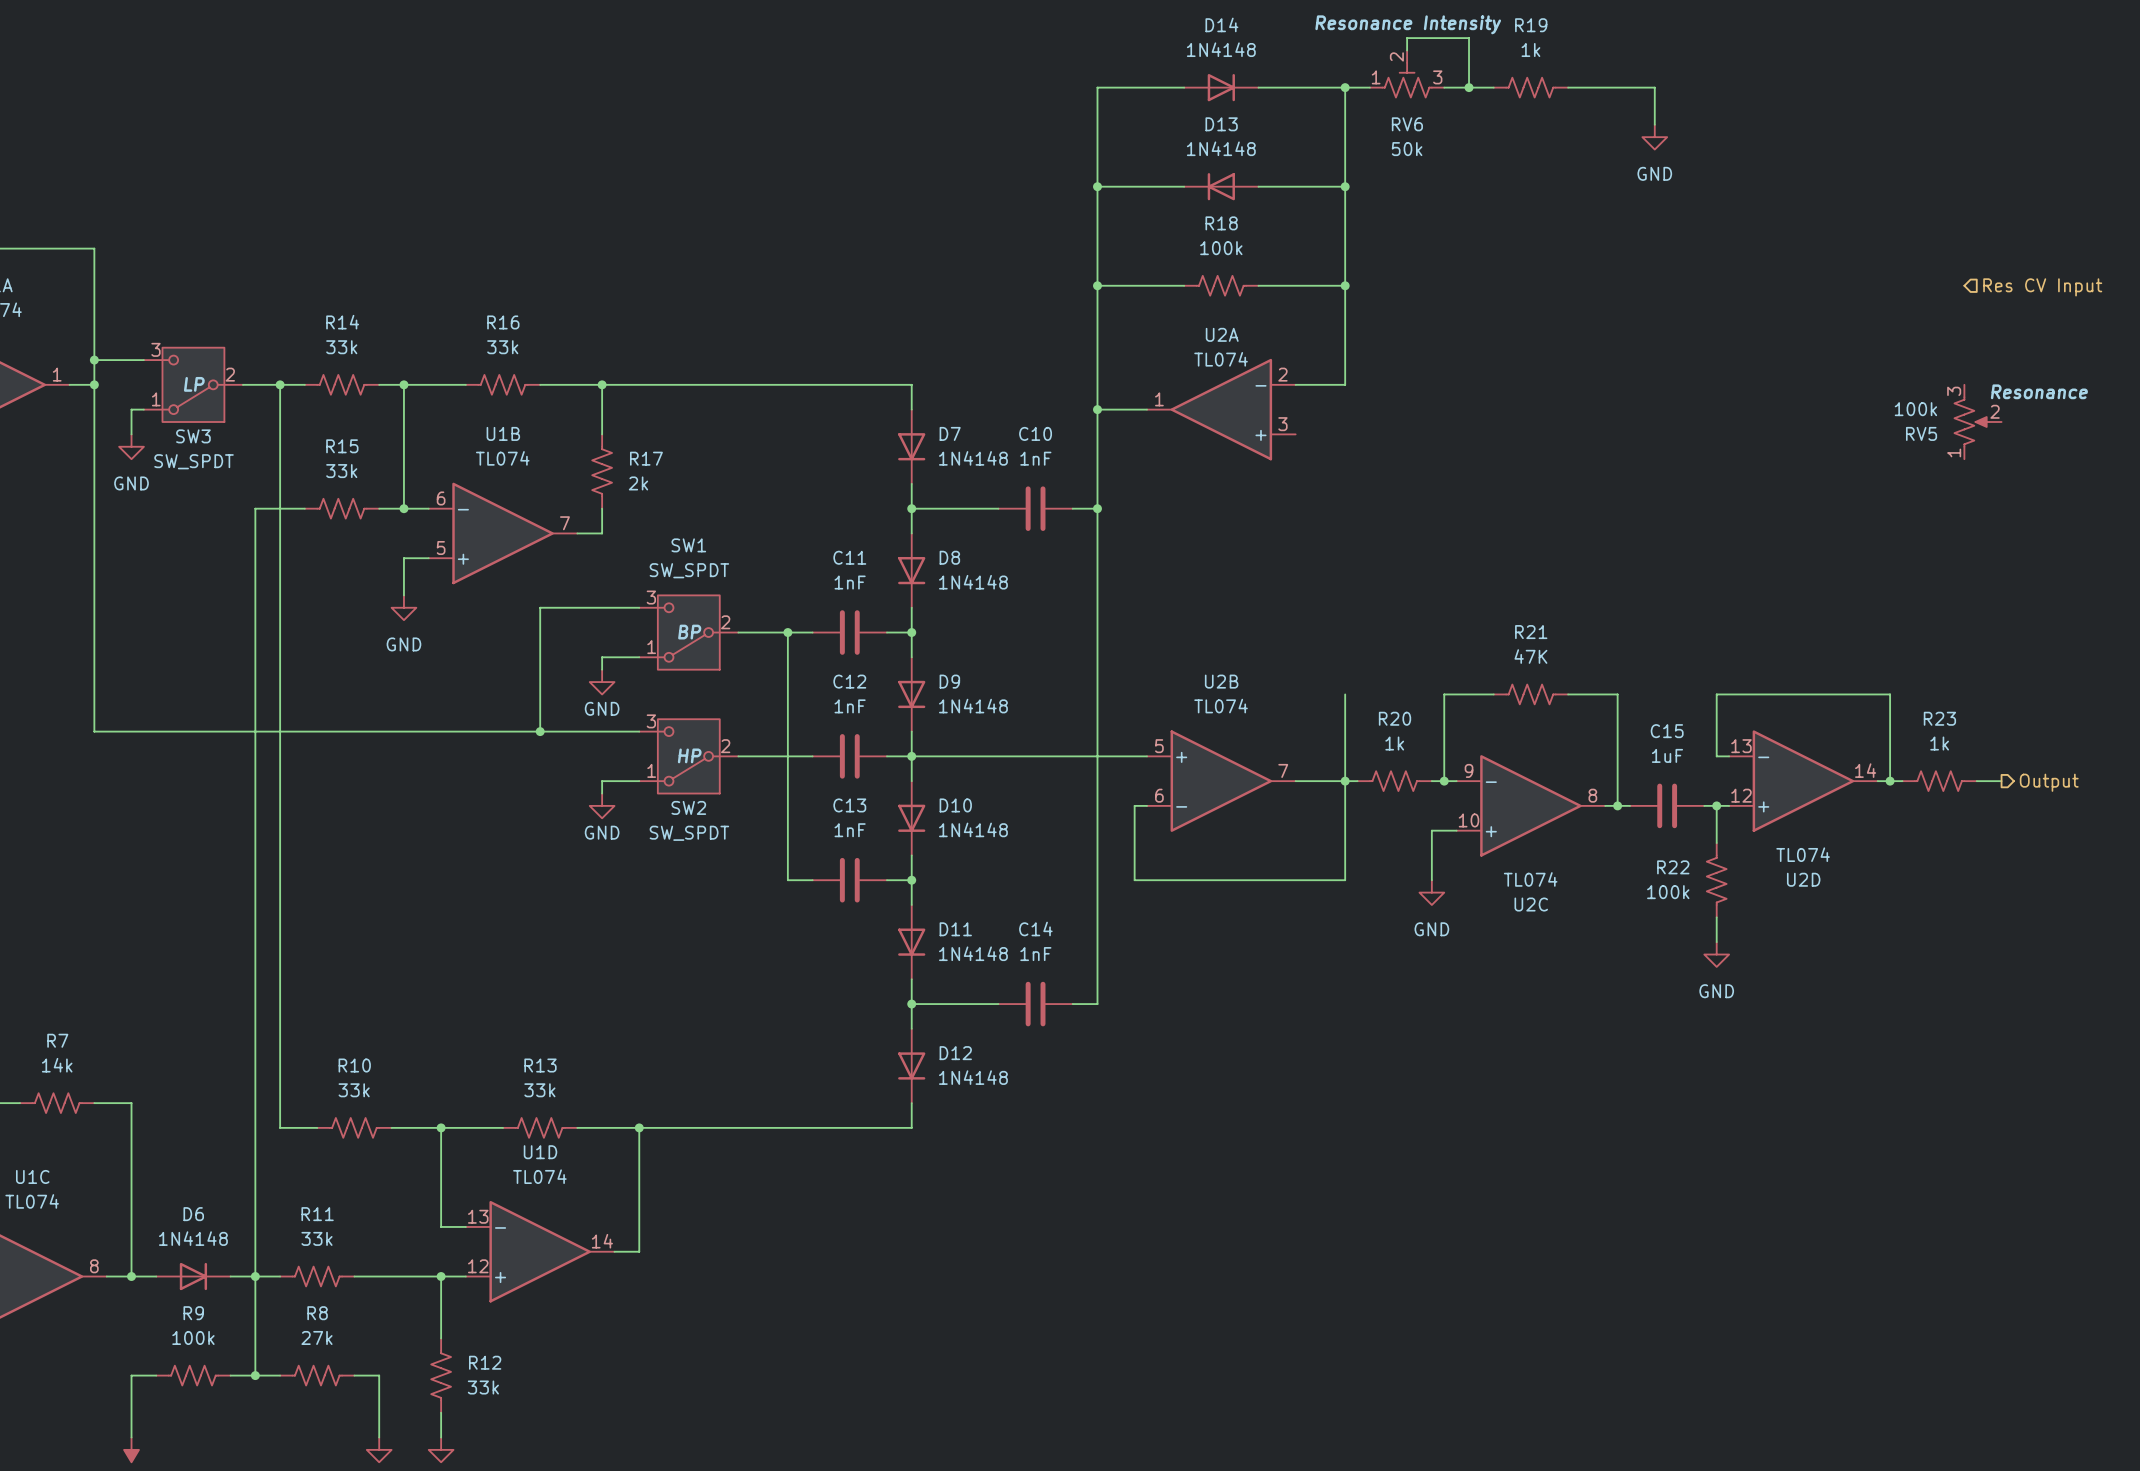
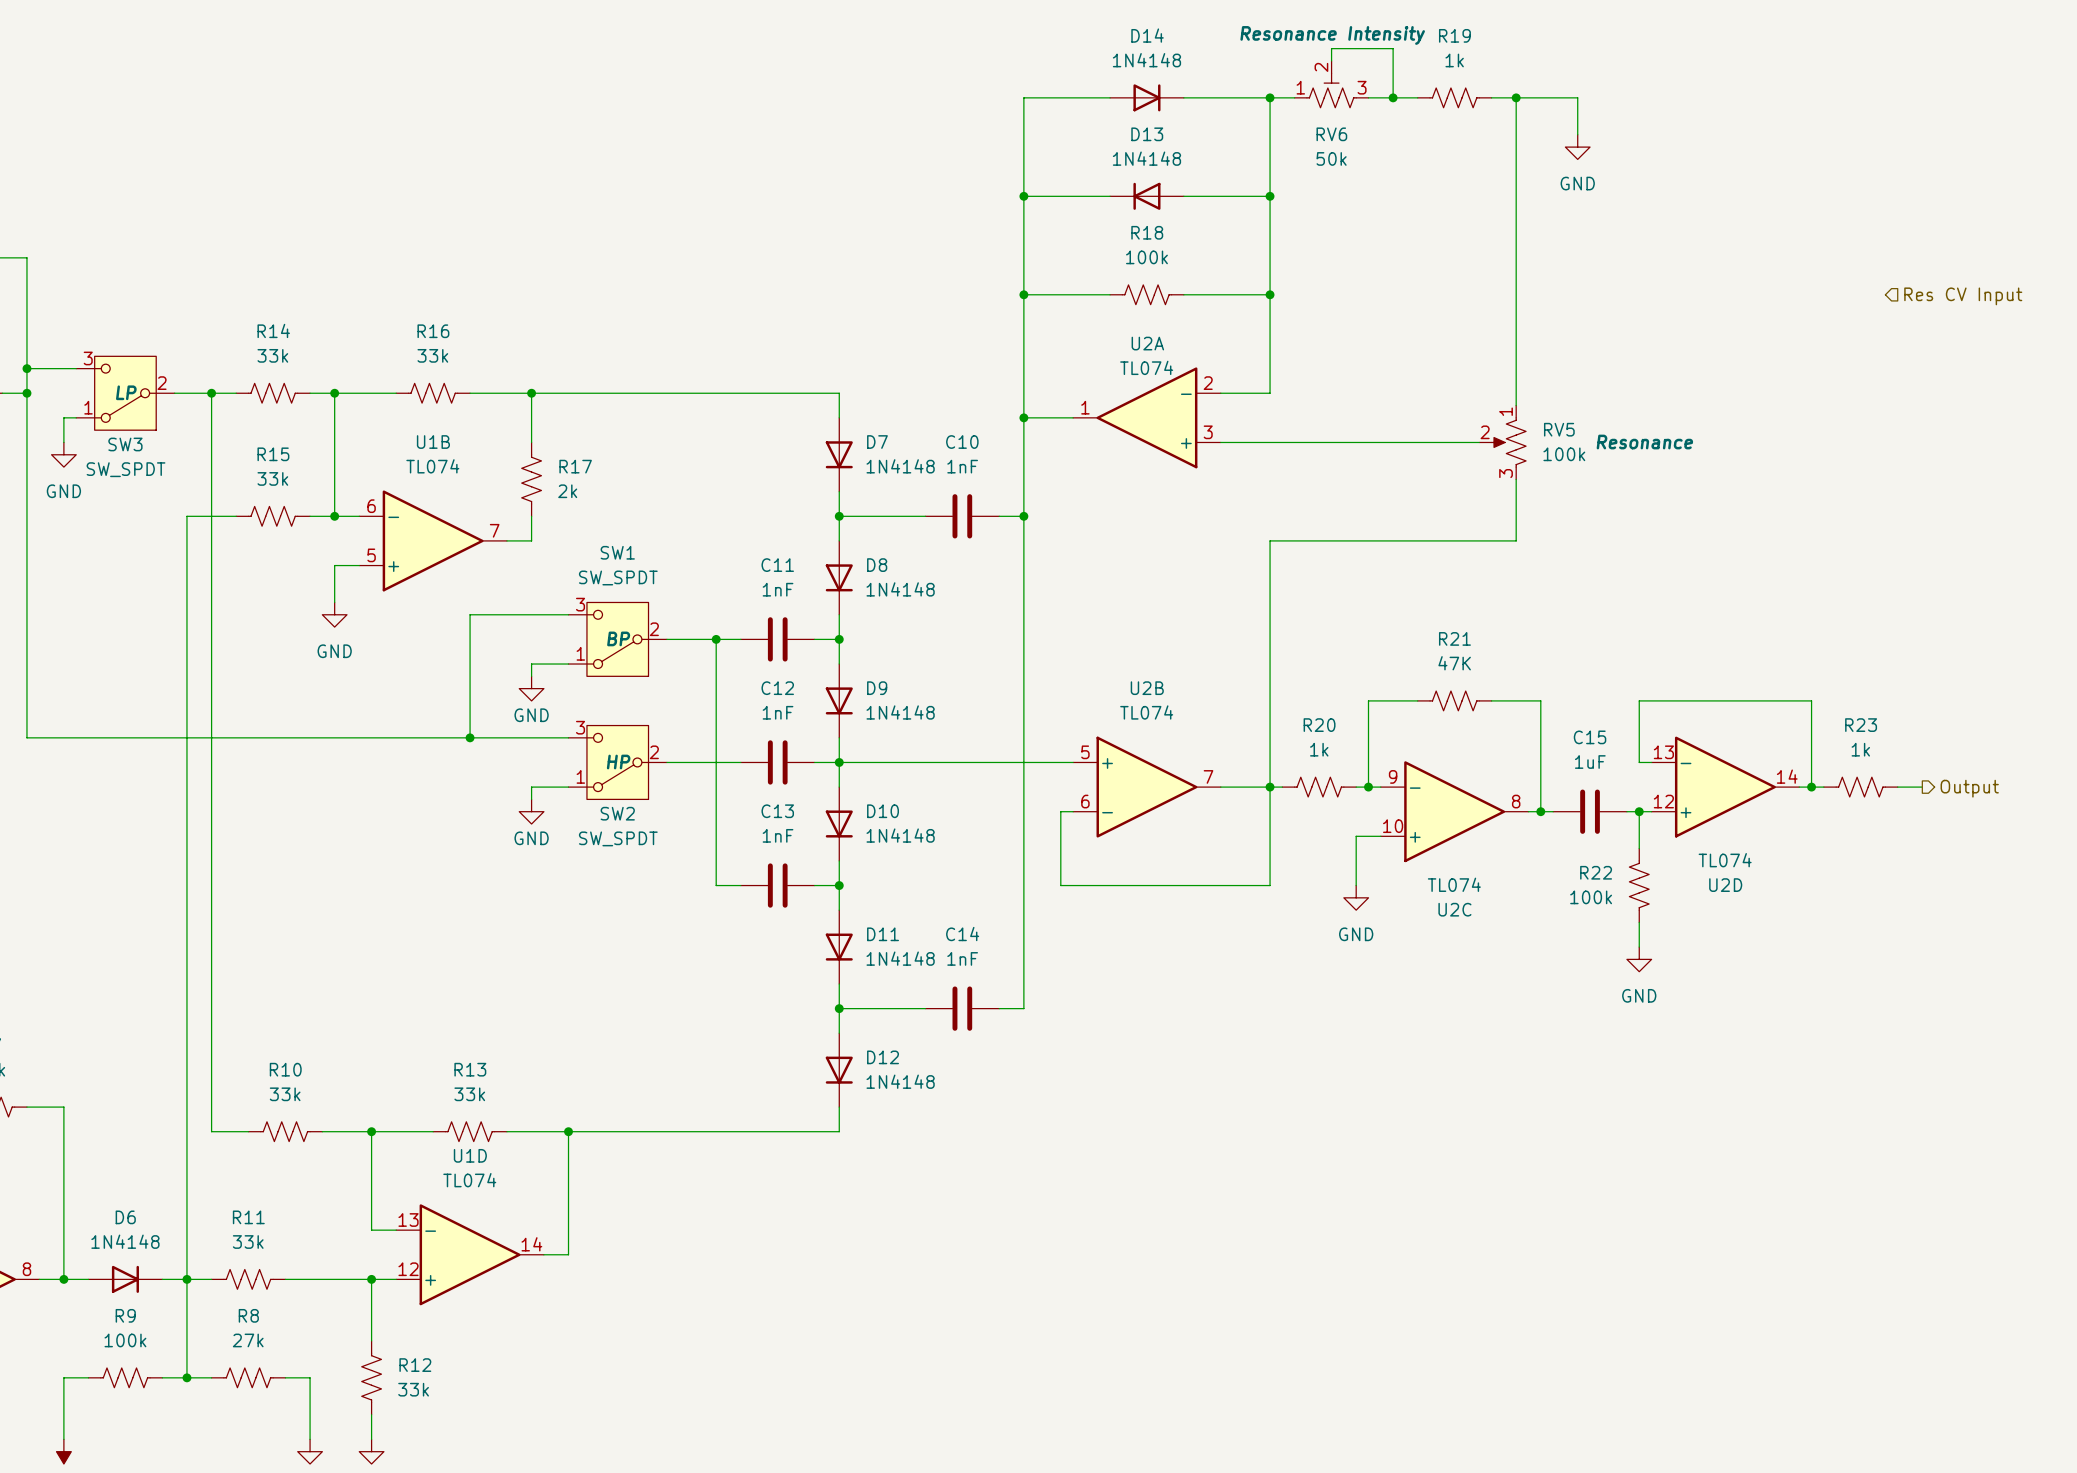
wire: none -> (1516, 97) (1516, 405)
junction: none -> (1516, 97)
RV5 text position: Resonance (2039, 391) -> Resonance (1644, 442)
RV5 rotation: 0° (1971, 421) -> 180° (1508, 442)
RV5 position: (1978, 421) -> (1502, 442)
wire: none -> (1220, 442) (1479, 442)
wire: none -> (1516, 479) (1516, 540) (1270, 540) (1270, 700)

